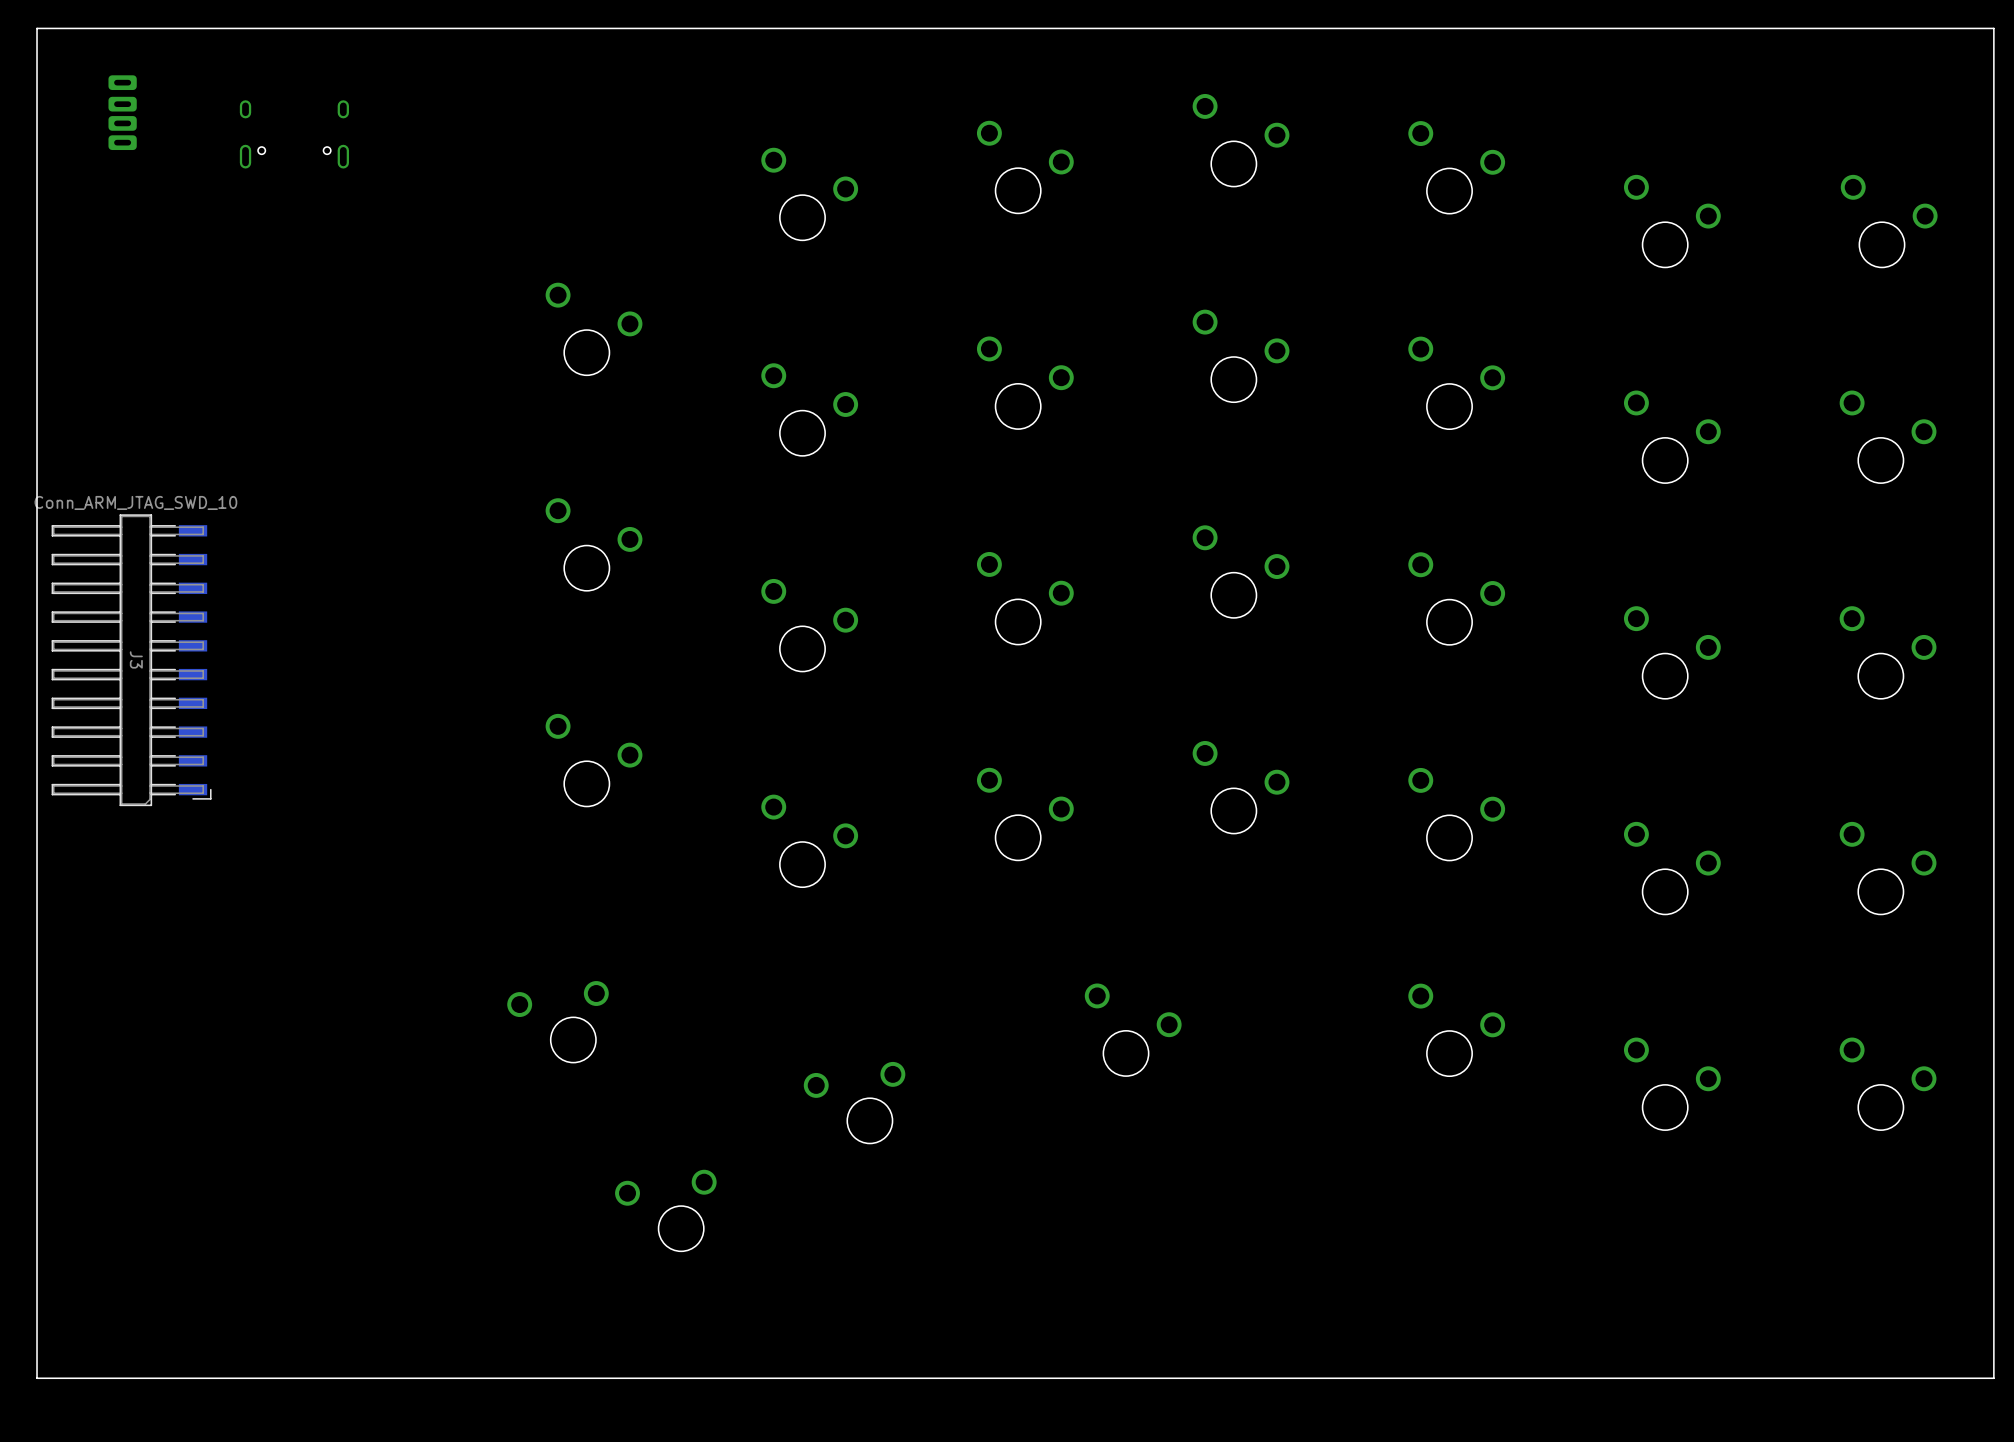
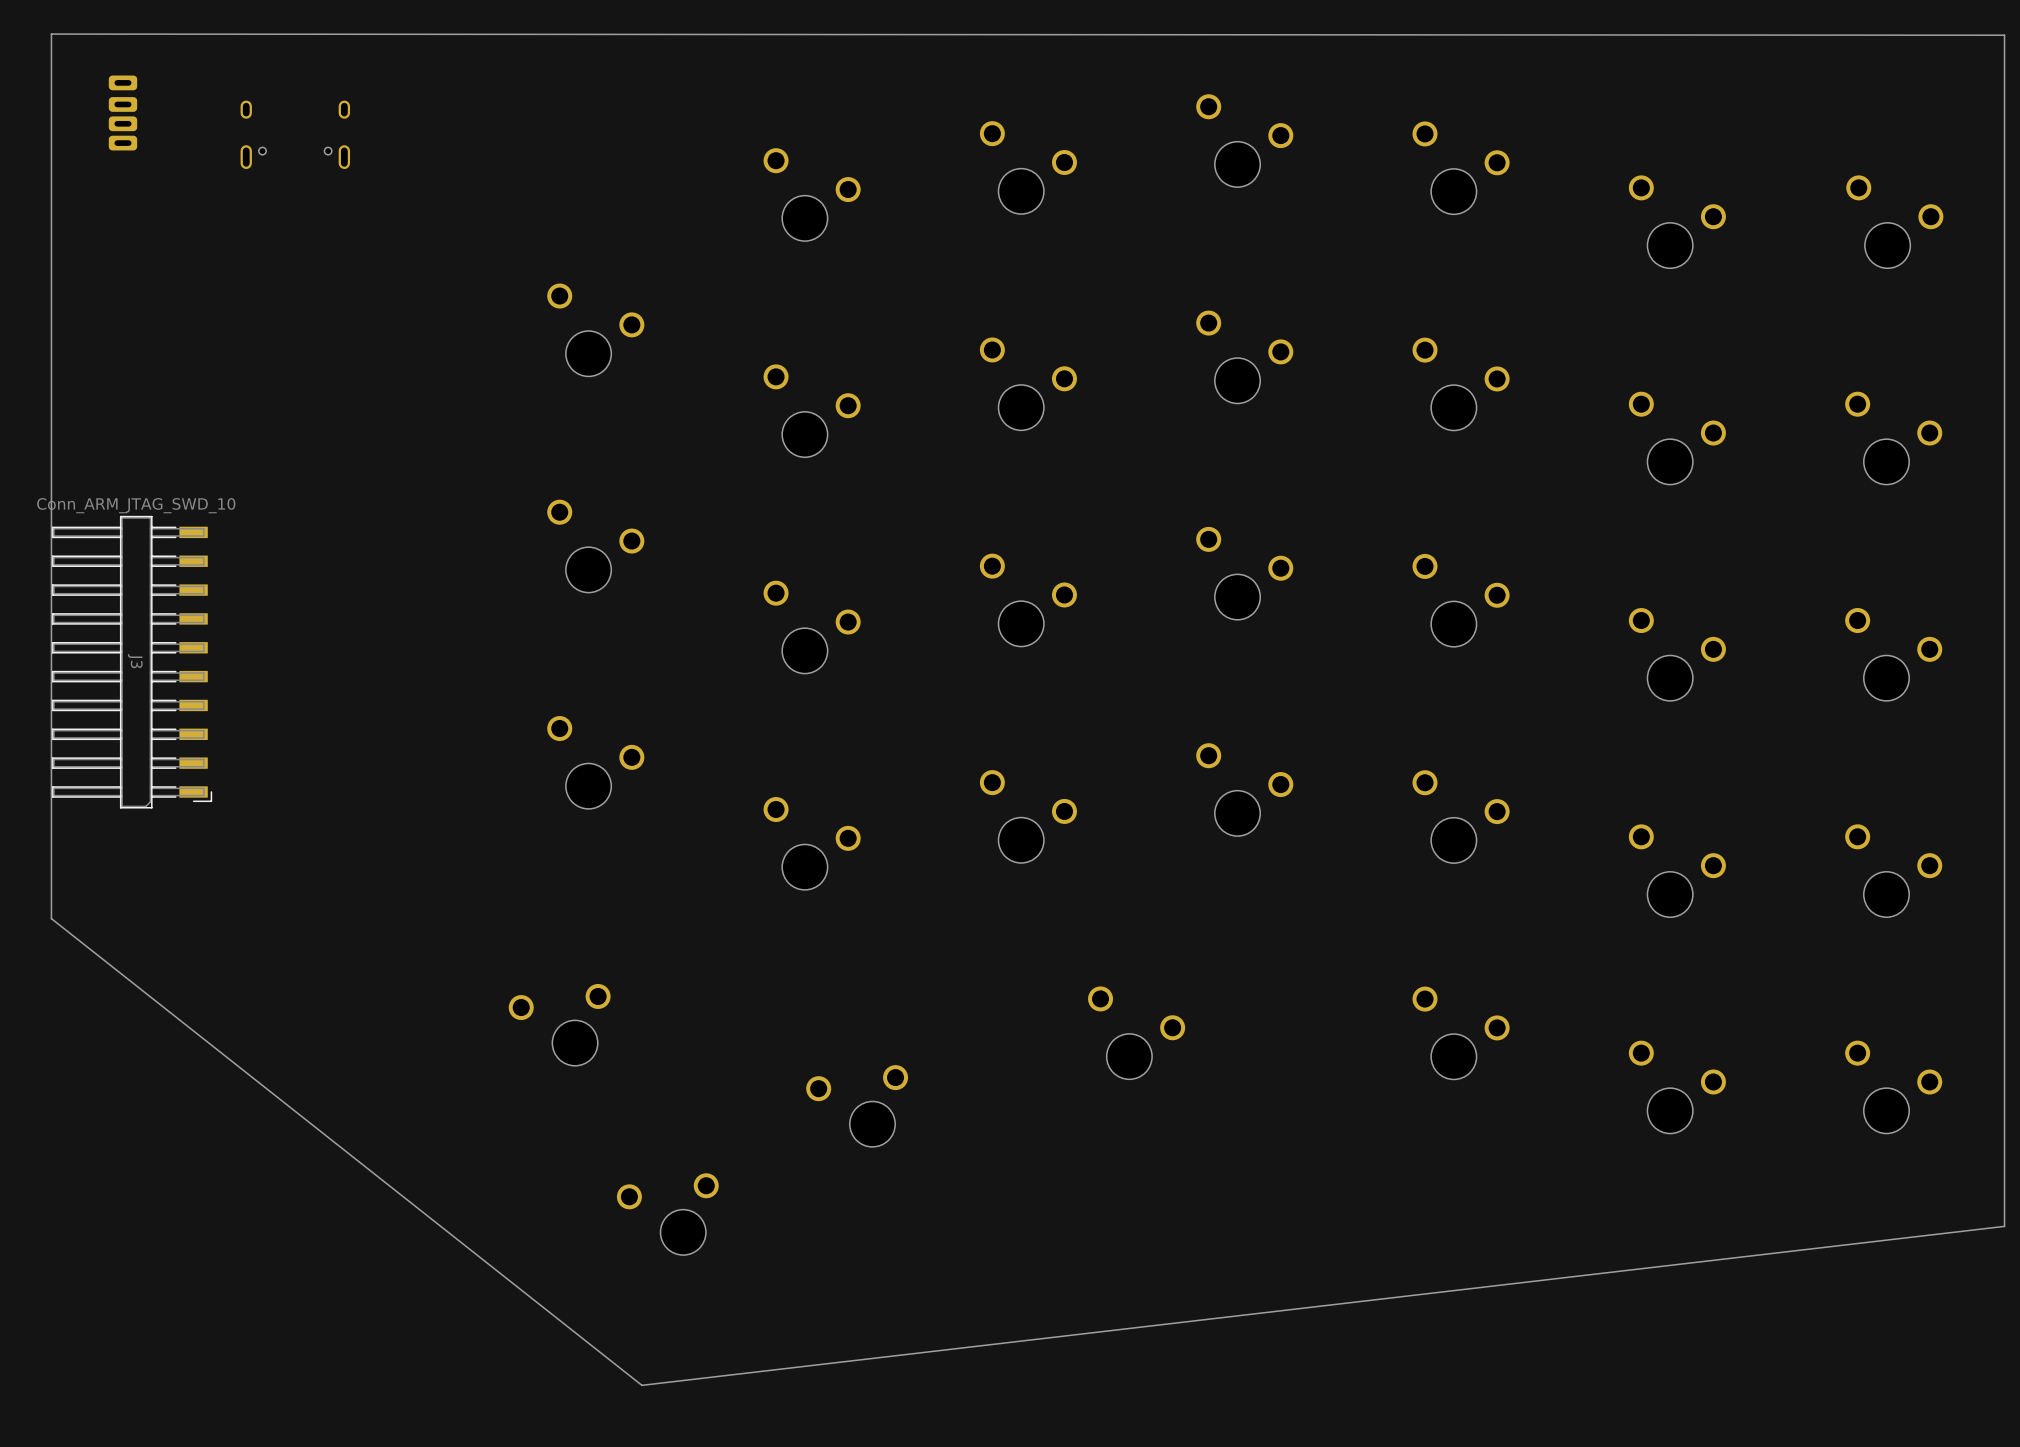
board edge: (1993, 28) (37, 28) (37, 1378) (1993, 1378) (1993, 28) -> (51, 34) (2004, 35) (2004, 1226) (641, 1385) (51, 918) (51, 34)

